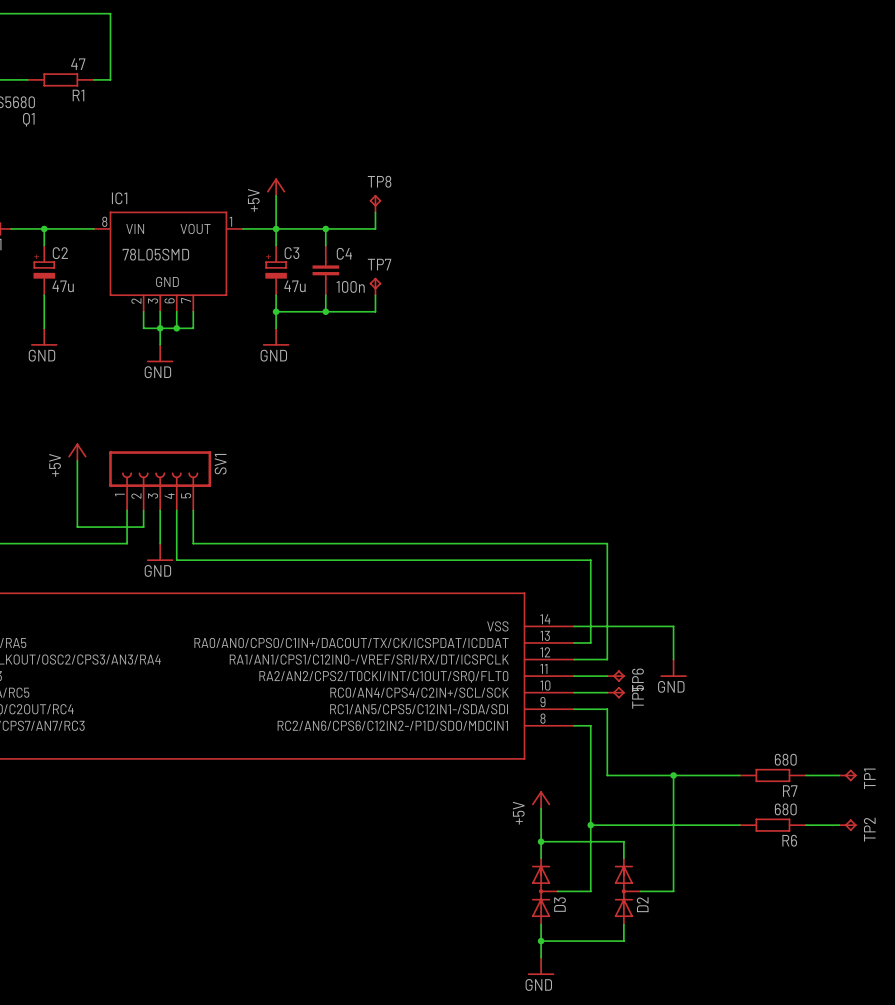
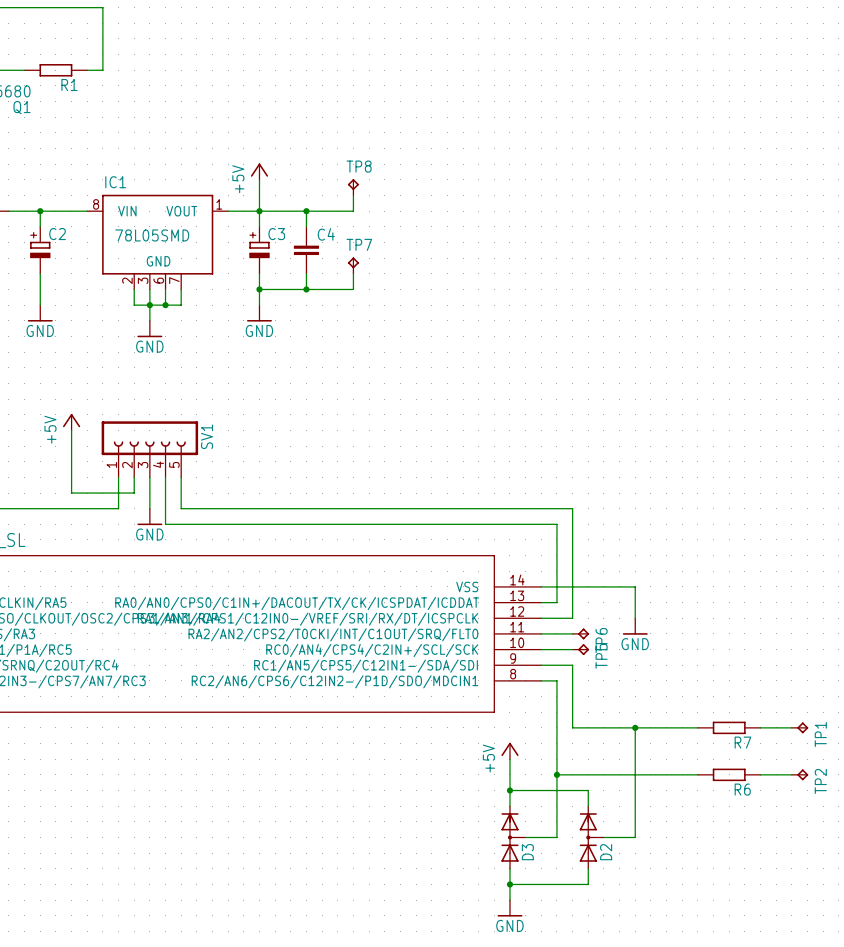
R1 value: 47 (78, 64) -> none
C2 value: 47u (63, 286) -> none
C3 value: 47u (294, 286) -> none
C4 value: 100n (350, 286) -> none
R7 value: 680 (785, 759) -> none
R6 value: 680 (785, 809) -> none

